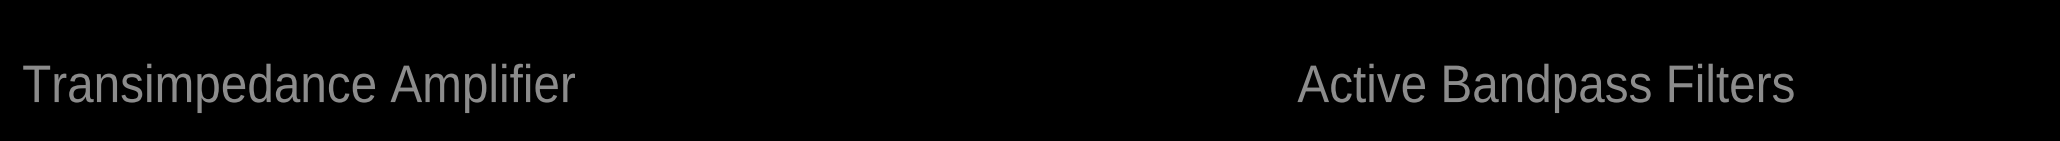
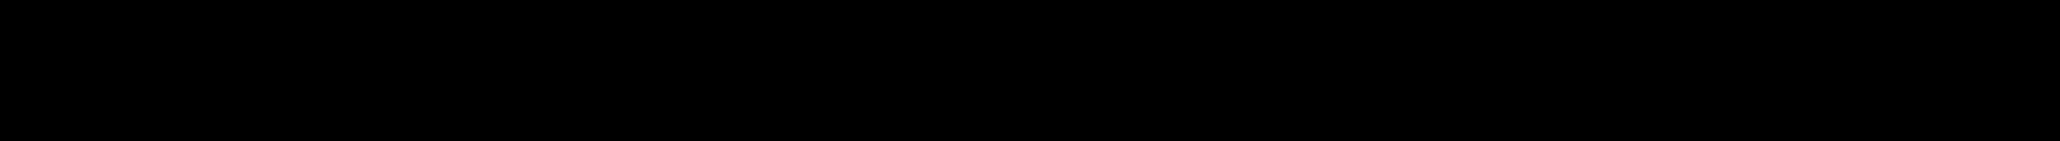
text: Transimpedance Amplifier (299, 88) -> none
text: Active Bandpass Filters (1545, 88) -> none

